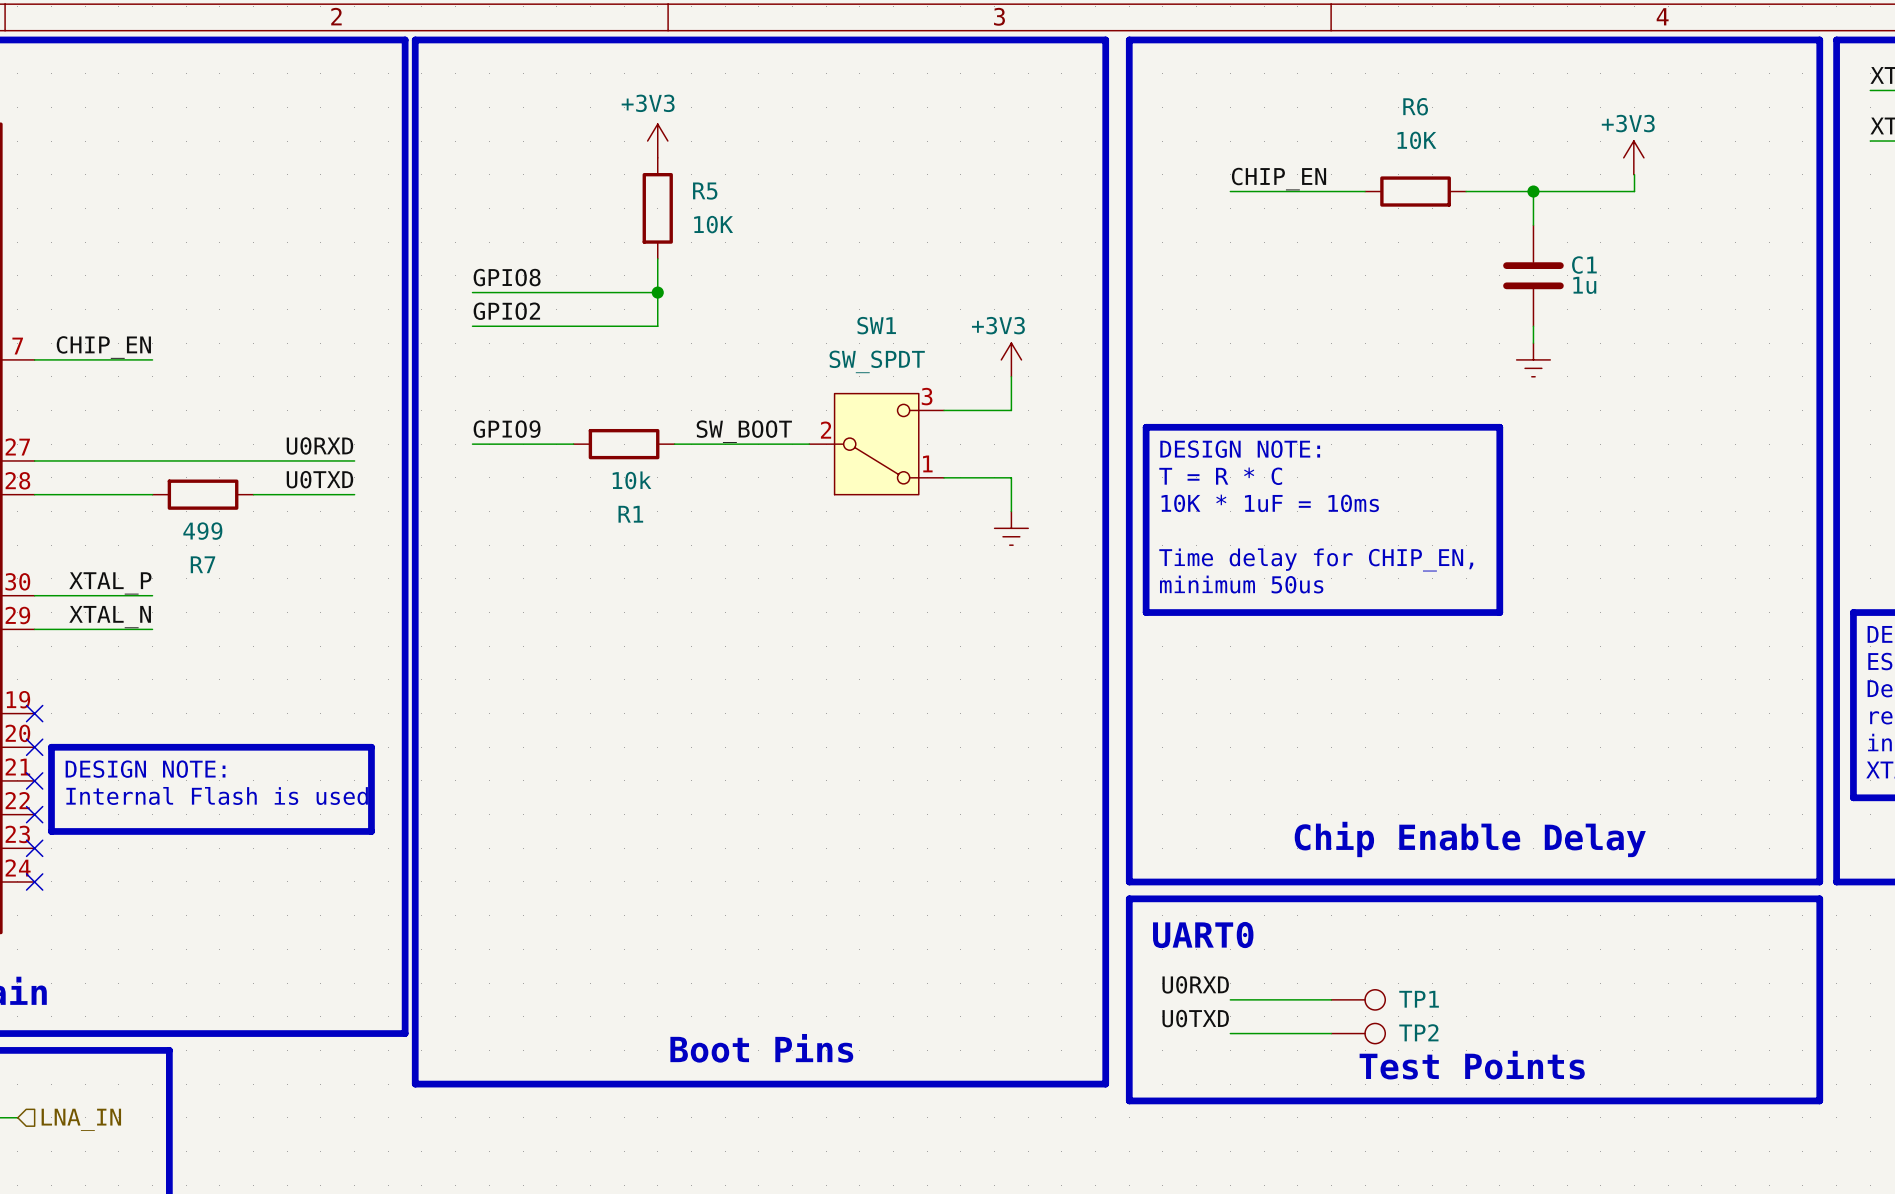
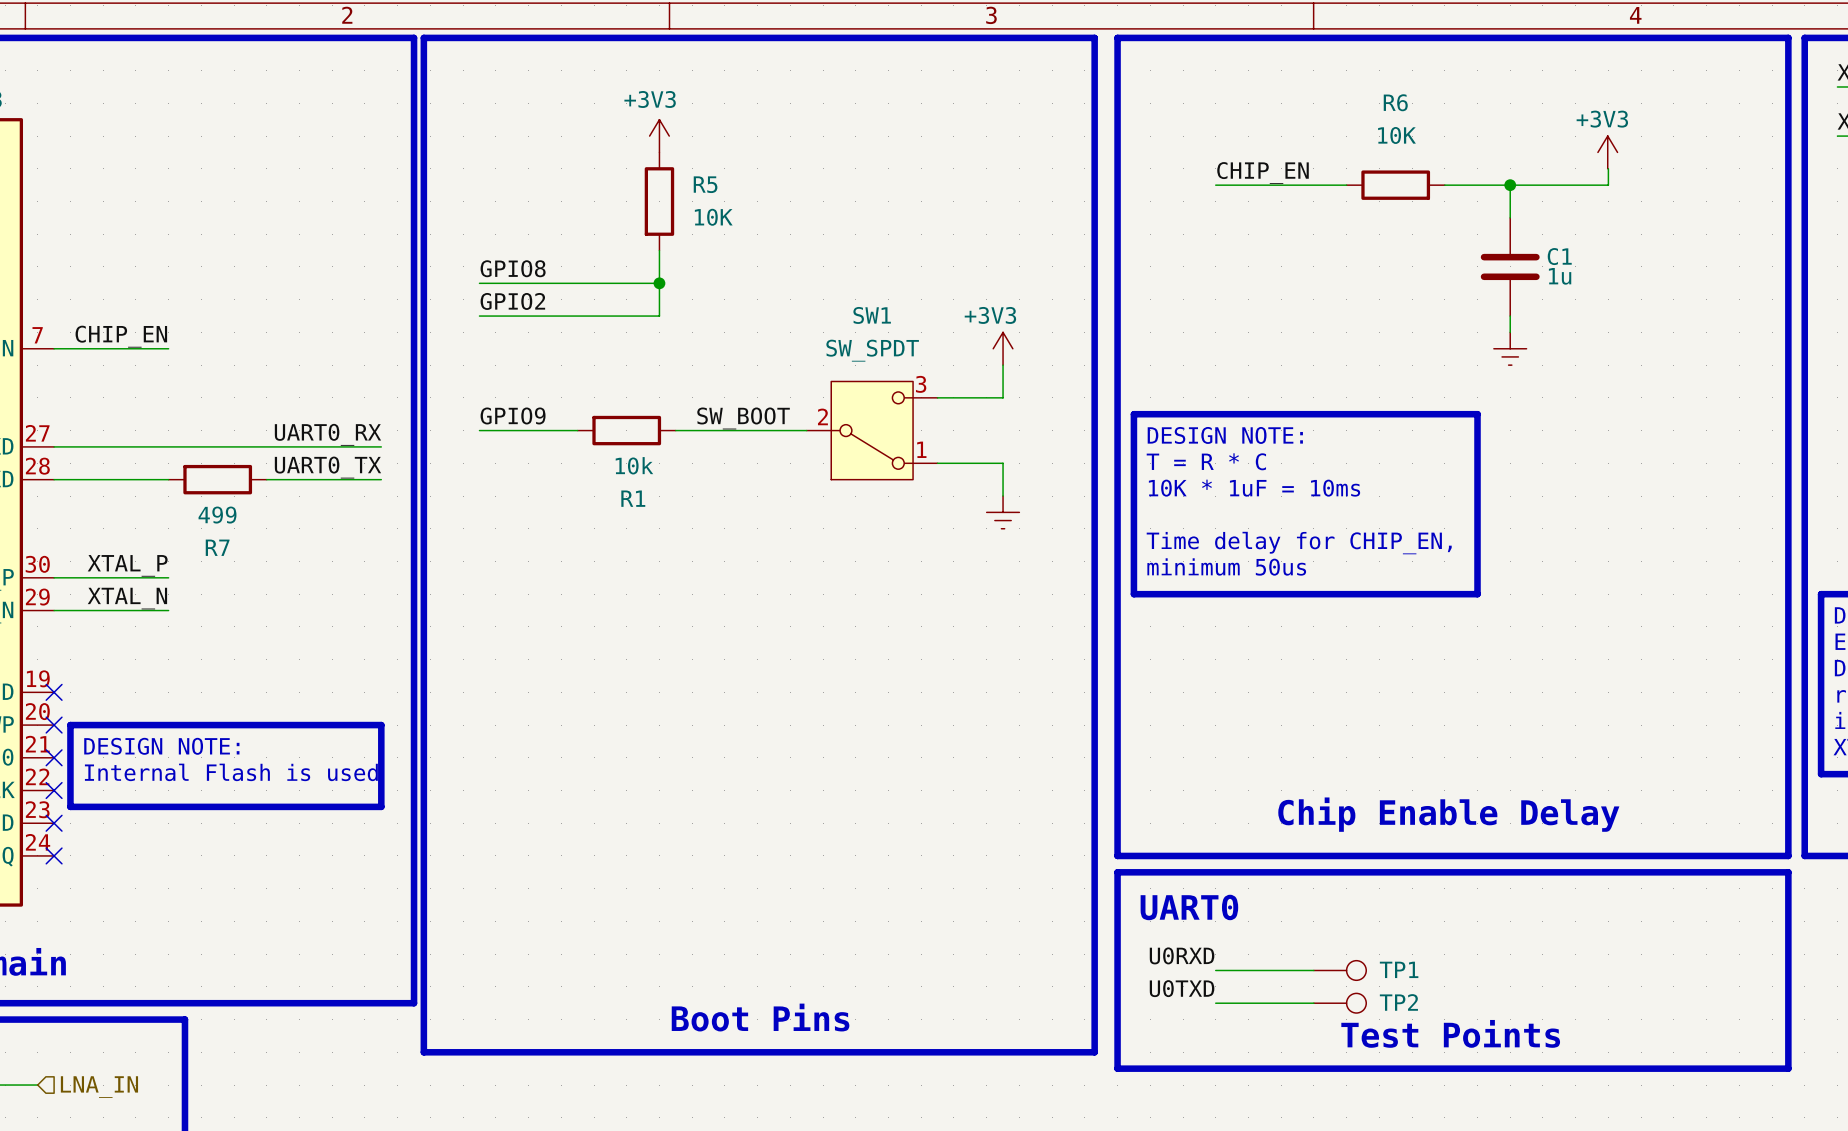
label: U0RXD (319, 445) -> UART0_RX (327, 434)
wire: none -> (364, 446) (381, 446)
label: U0TXD (319, 479) -> UART0_TX (327, 467)
wire: none -> (364, 479) (381, 479)

